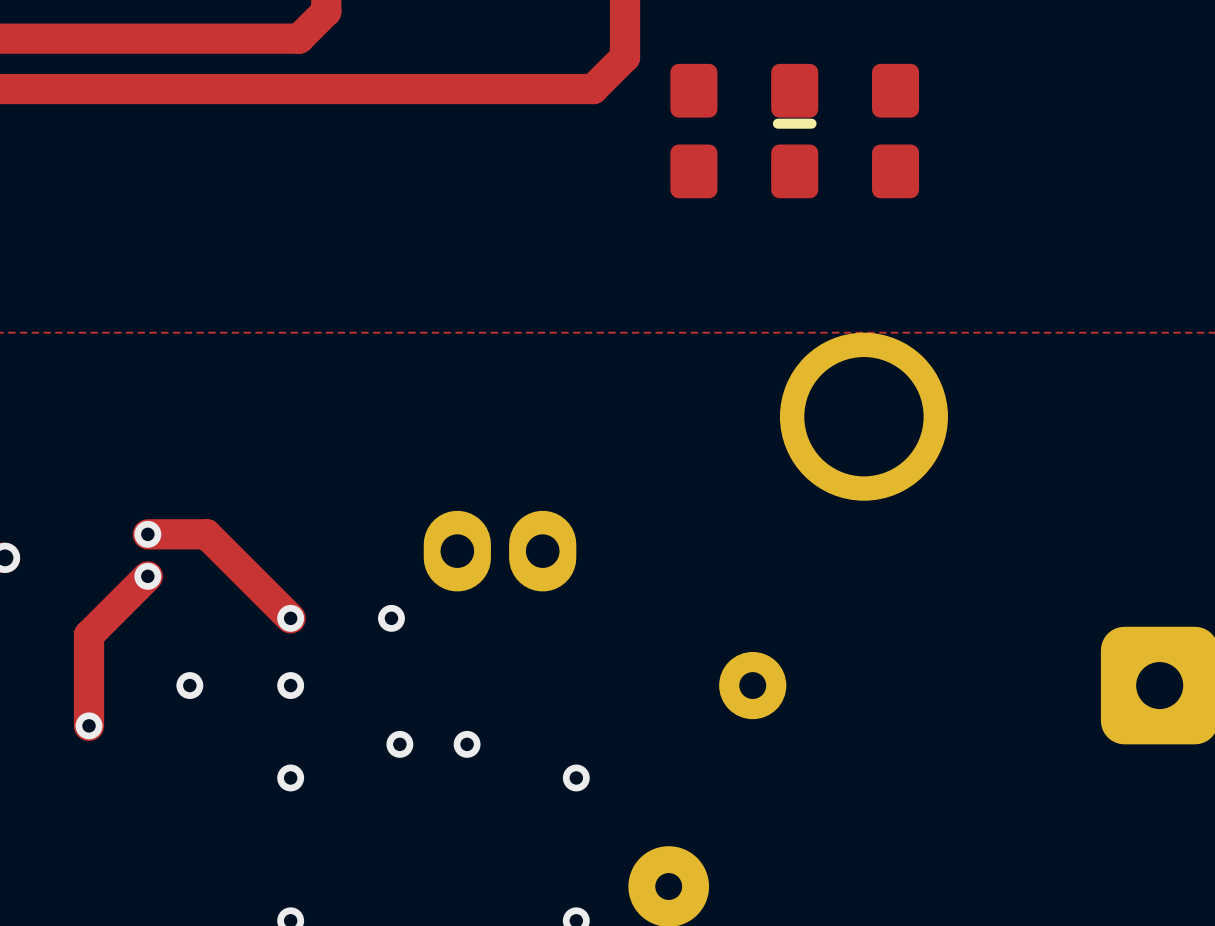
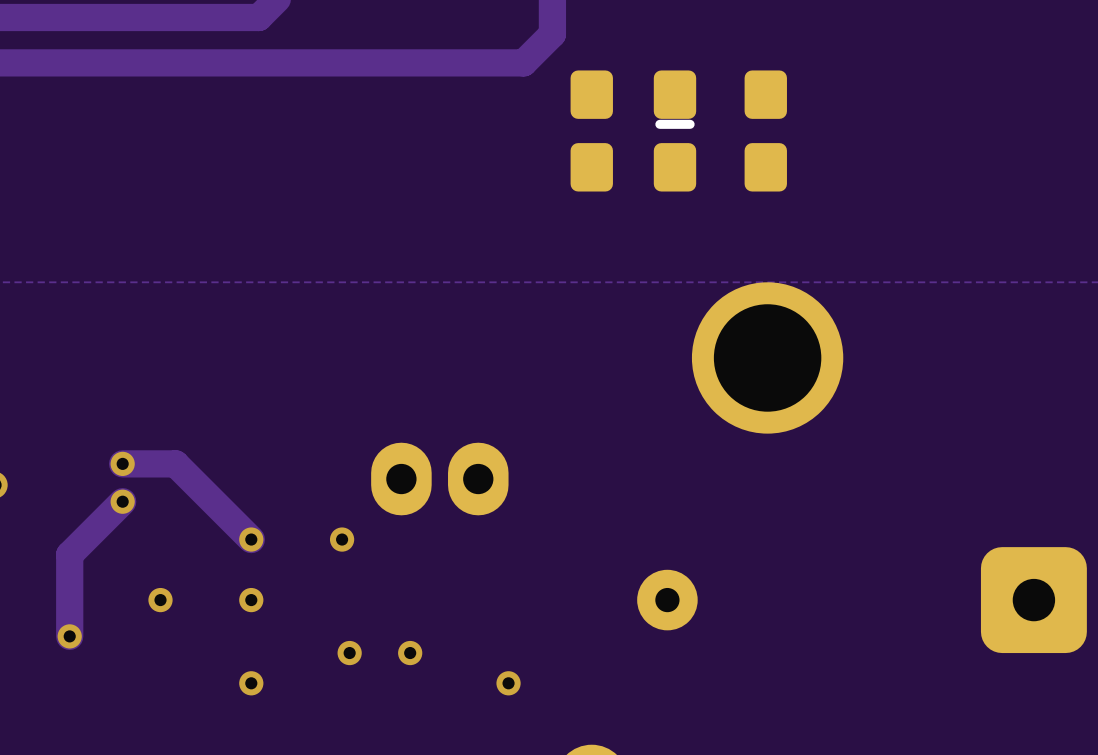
part position: (693, 131) -> (591, 130)
part position: (794, 131) -> (674, 130)
part position: (895, 131) -> (765, 130)

